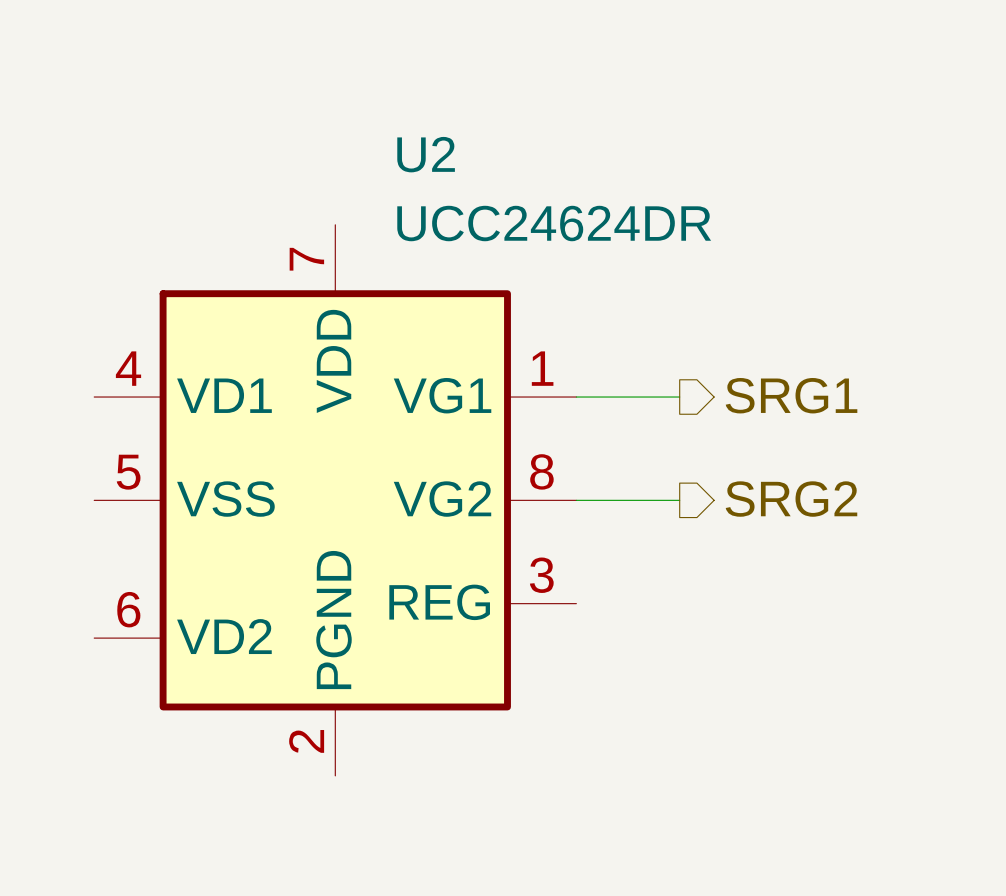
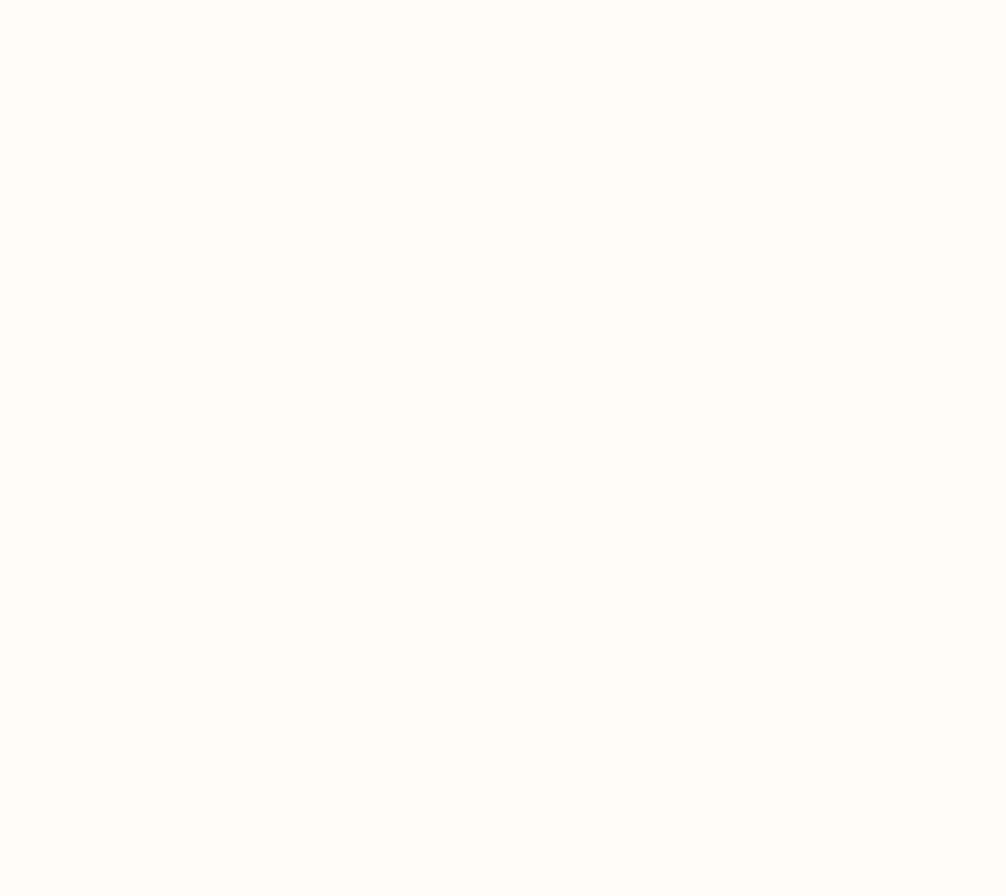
hierarchical label: SRG1 (791, 395) -> none
wire: (576, 397) (679, 397) -> none
hierarchical label: SRG2 (791, 499) -> none
U2: UCC24624DR (335, 500) -> none
wire: (576, 500) (679, 500) -> none

